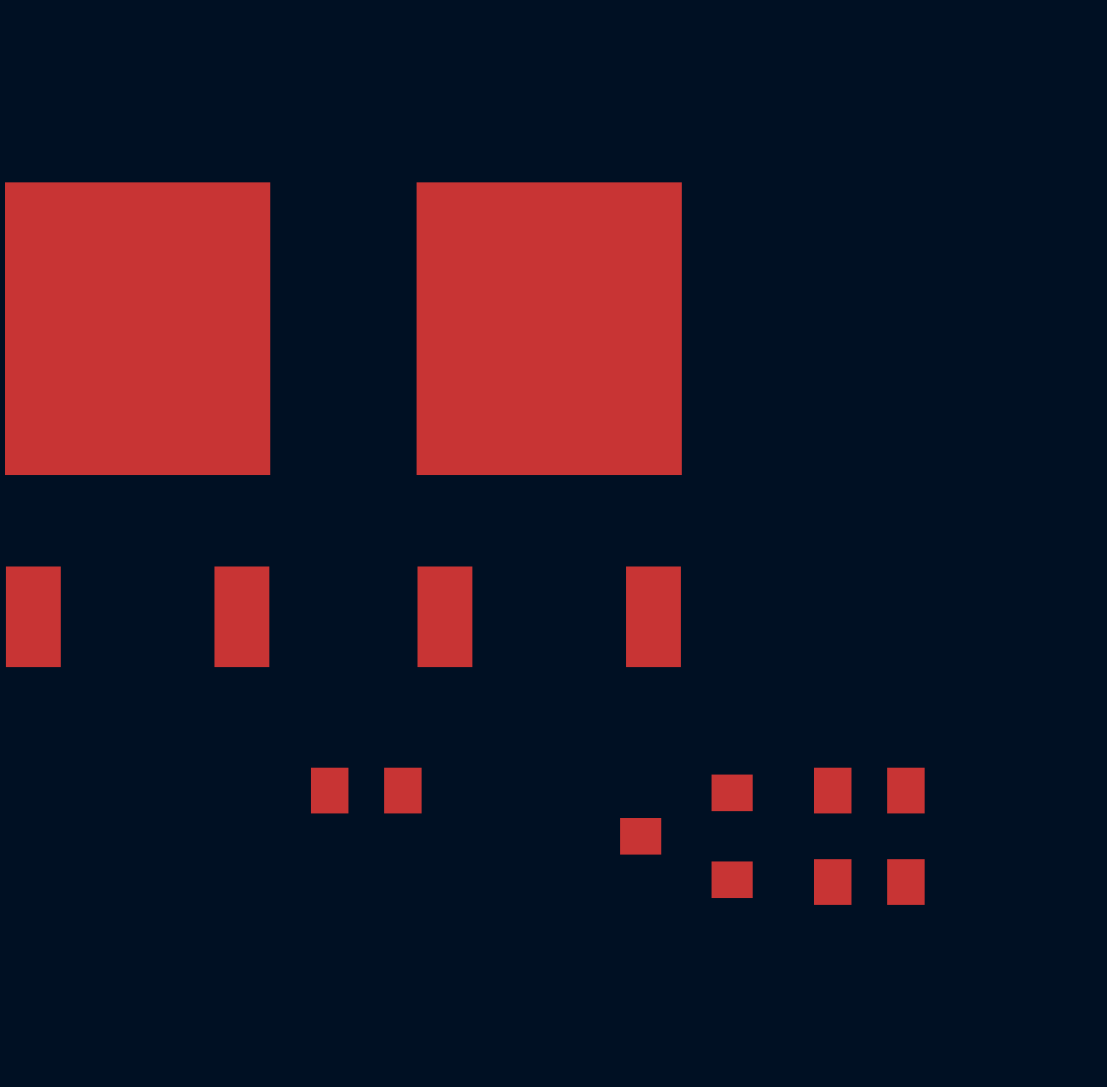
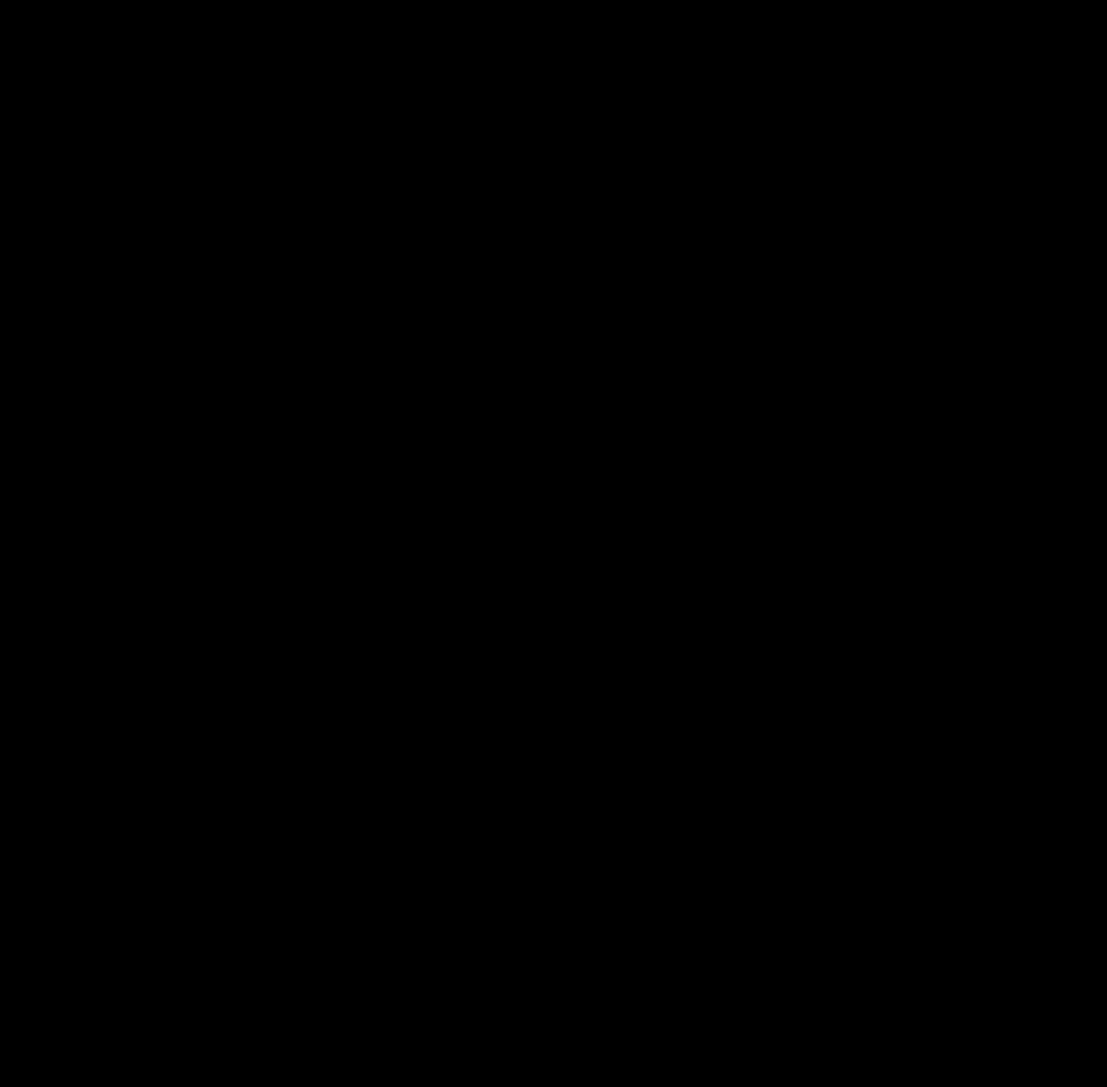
part: (137, 424) -> none
part: (549, 424) -> none
part: (366, 790) -> none
part: (869, 790) -> none
part: (686, 836) -> none
part: (869, 882) -> none

